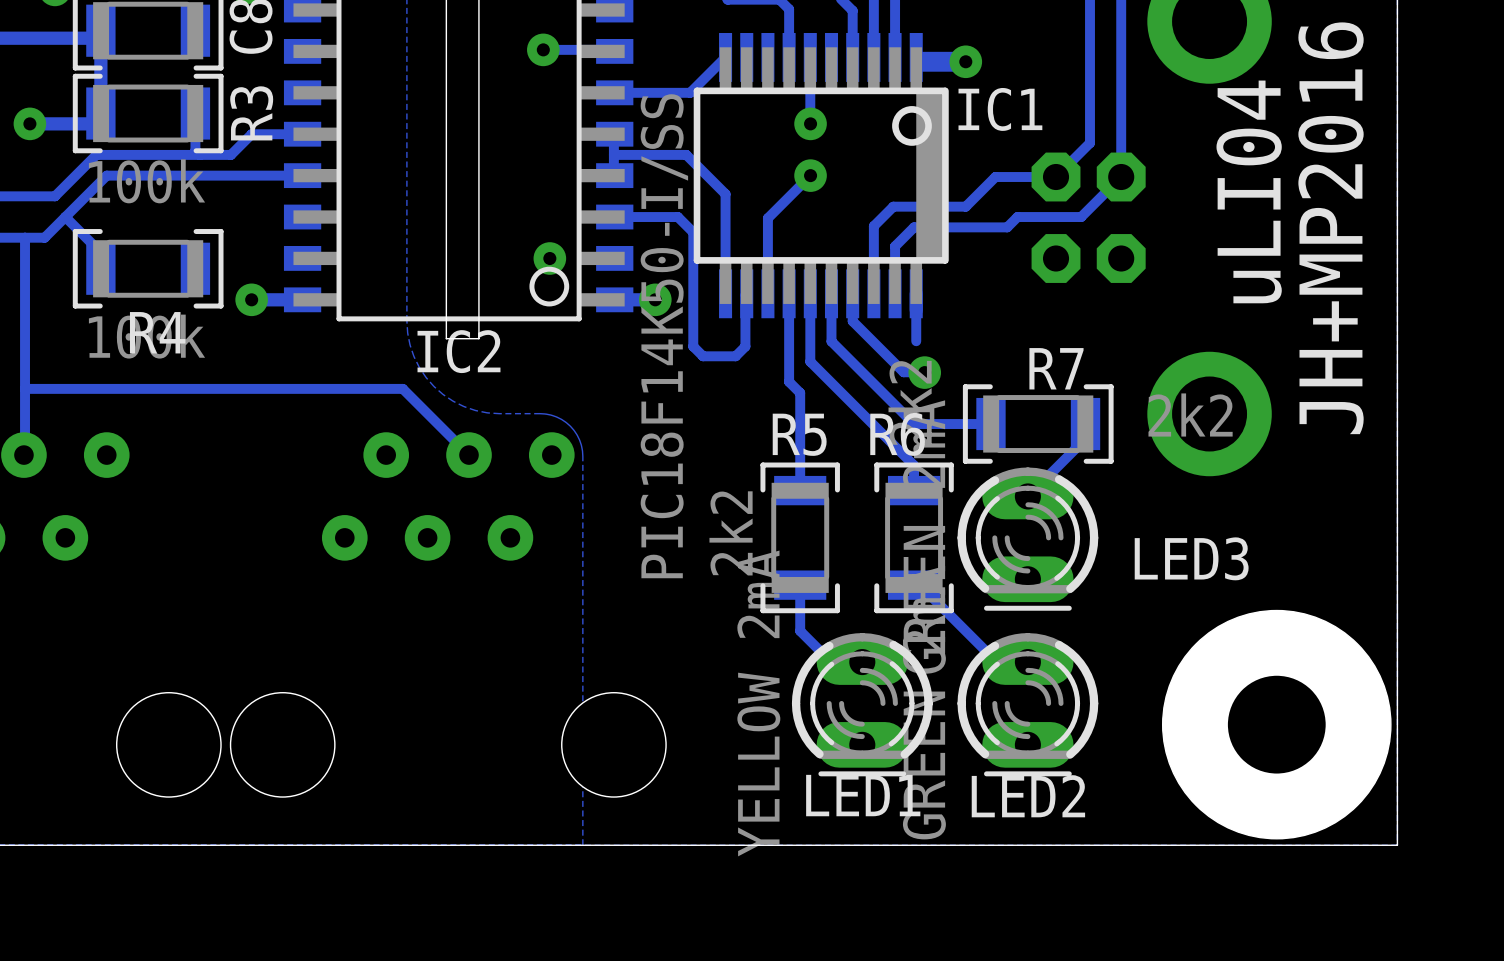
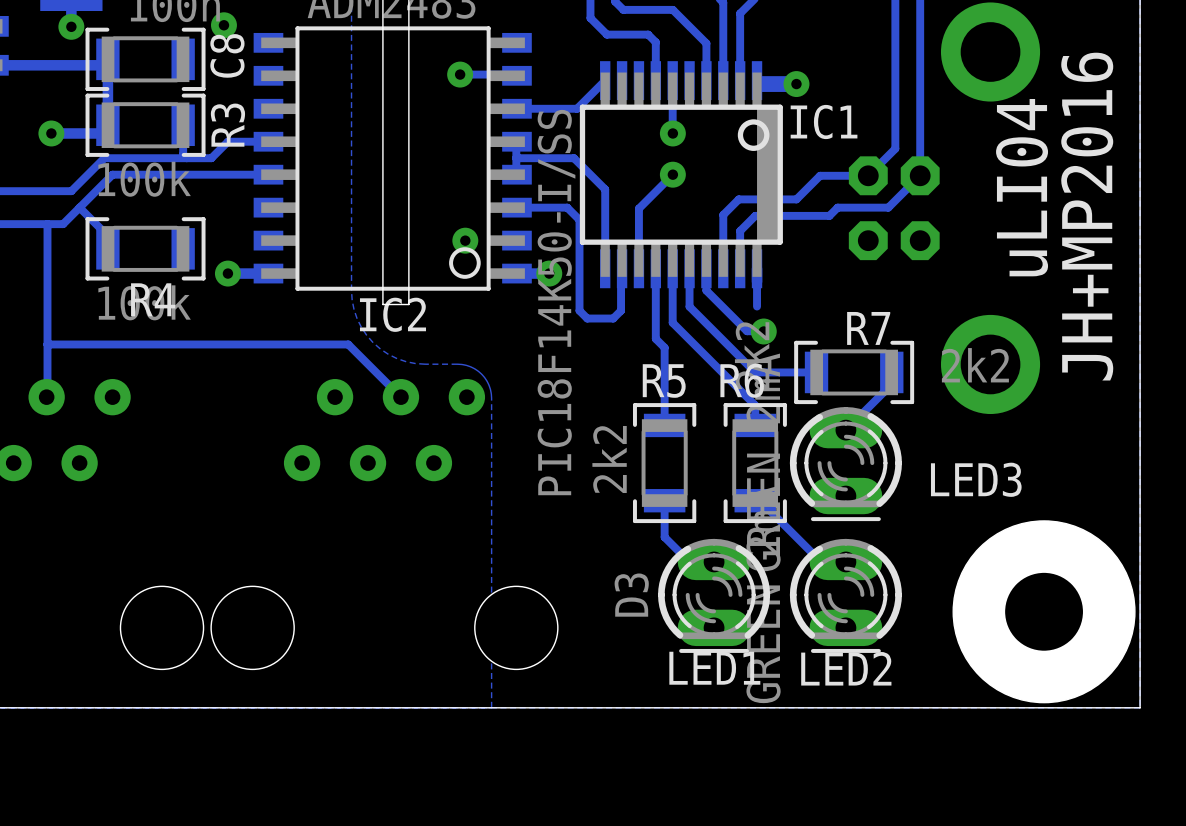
LED1 value: YELLOW 2mA (758, 703) -> D3 (631, 595)

